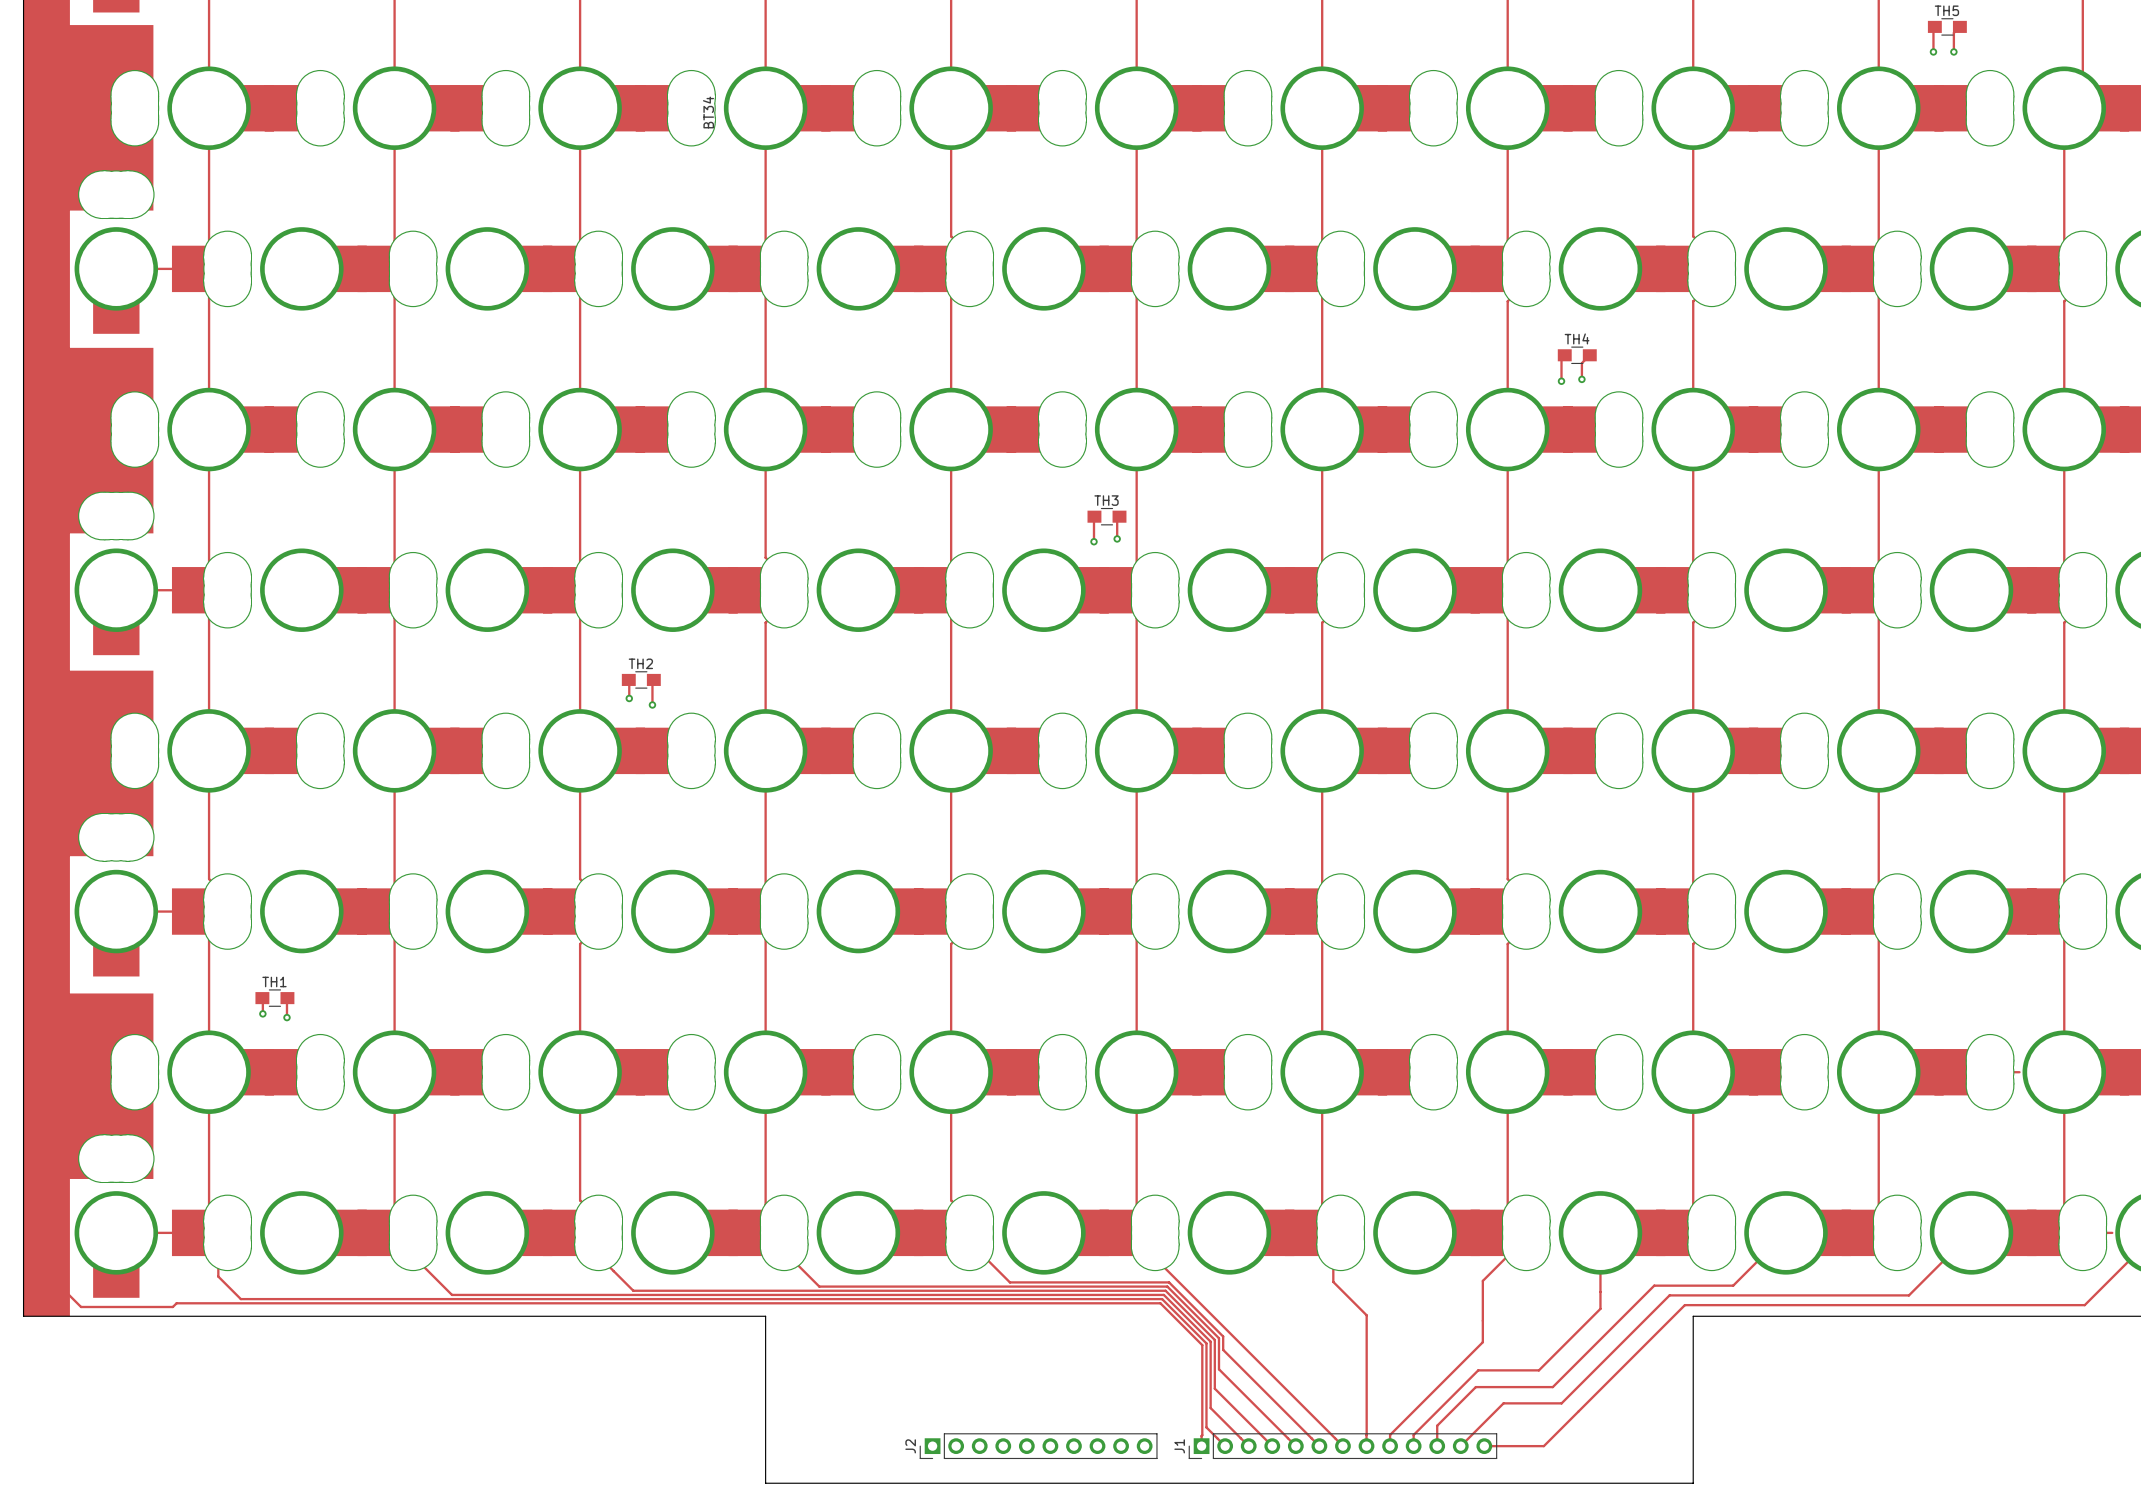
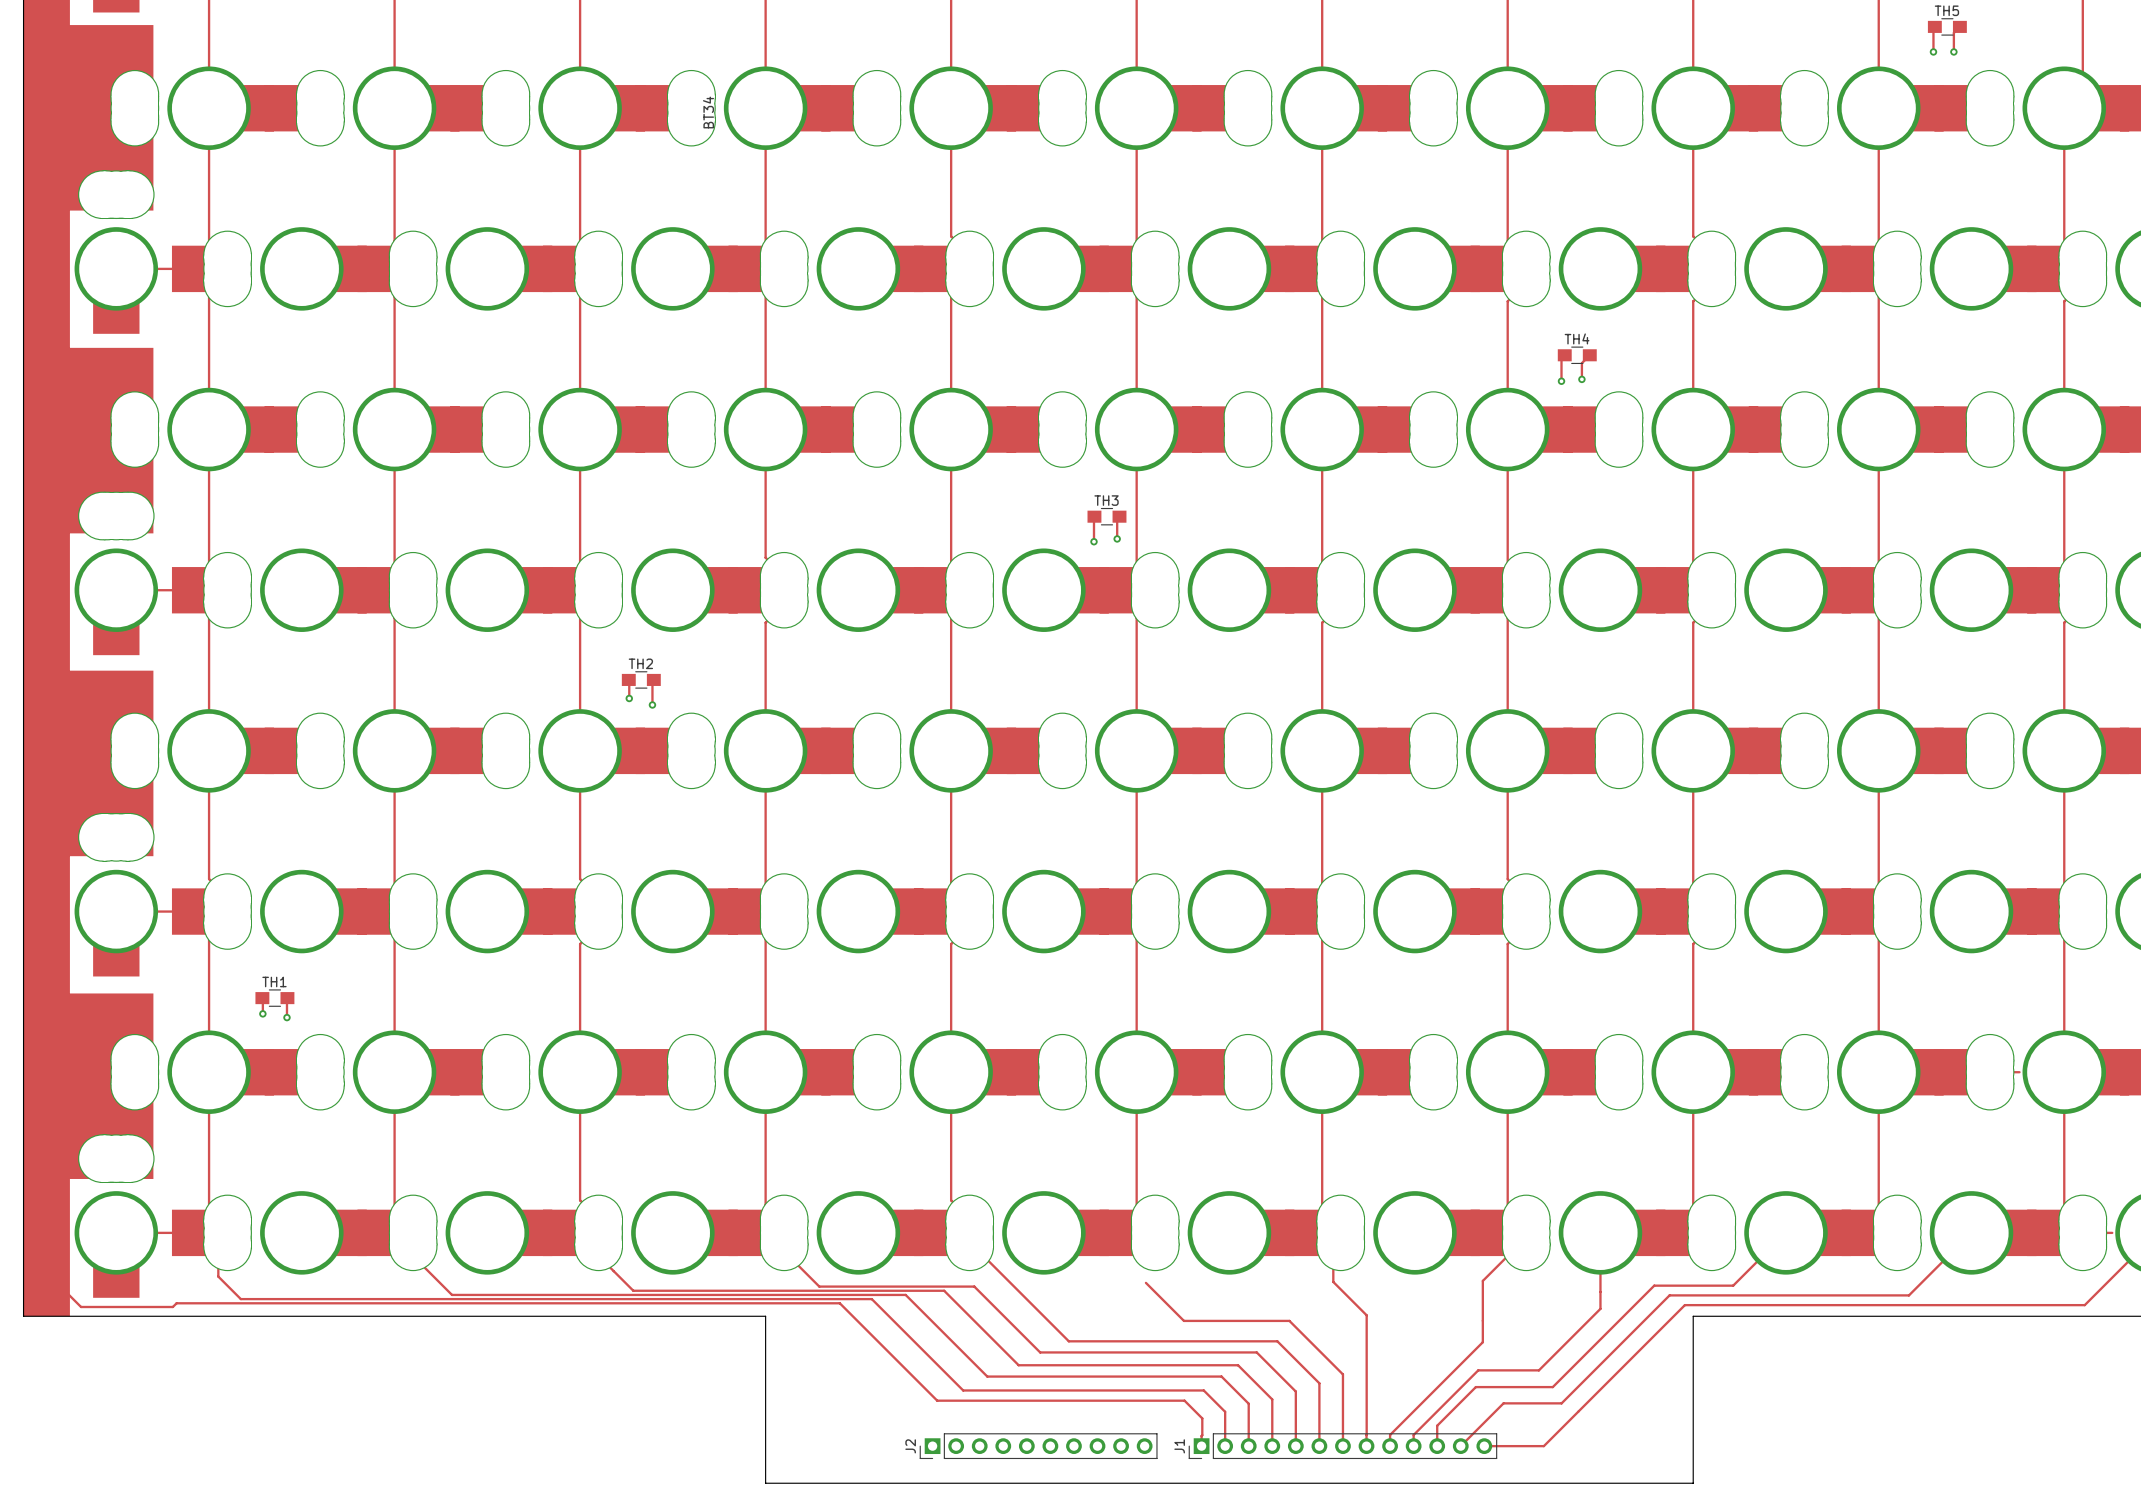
track: (1145, 1249) (1342, 1446) -> (1183, 1320) (1289, 1320) (1342, 1374) (1342, 1446)
track: (1009, 1282) (1169, 1282) (1223, 1336) (1223, 1349) (1319, 1446) -> (1009, 1282) (1068, 1341) (1277, 1341) (1319, 1383) (1319, 1446)
track: (974, 1286) (1167, 1286) (1219, 1338) (1219, 1369) (1295, 1446) -> (974, 1286) (1040, 1352) (1256, 1352) (1295, 1391) (1295, 1446)
track: (944, 1290) (1165, 1290) (1214, 1339) (1214, 1388) (1272, 1446) -> (944, 1290) (1018, 1365) (1238, 1365) (1272, 1399) (1272, 1446)
track: (905, 1294) (1163, 1294) (1210, 1341) (1210, 1408) (1248, 1446) -> (905, 1294) (987, 1376) (1221, 1376) (1248, 1403) (1248, 1446)
track: (871, 1299) (1162, 1299) -> (871, 1299) (963, 1390) (1203, 1390) (1225, 1411) (1225, 1446)
track: (839, 1303) (1160, 1303) (1202, 1345) (1202, 1418) -> (839, 1303) (937, 1400) (1184, 1400) (1202, 1418)
track: (1183, 1320) (1206, 1343) (1206, 1427) (1225, 1446) -> none

